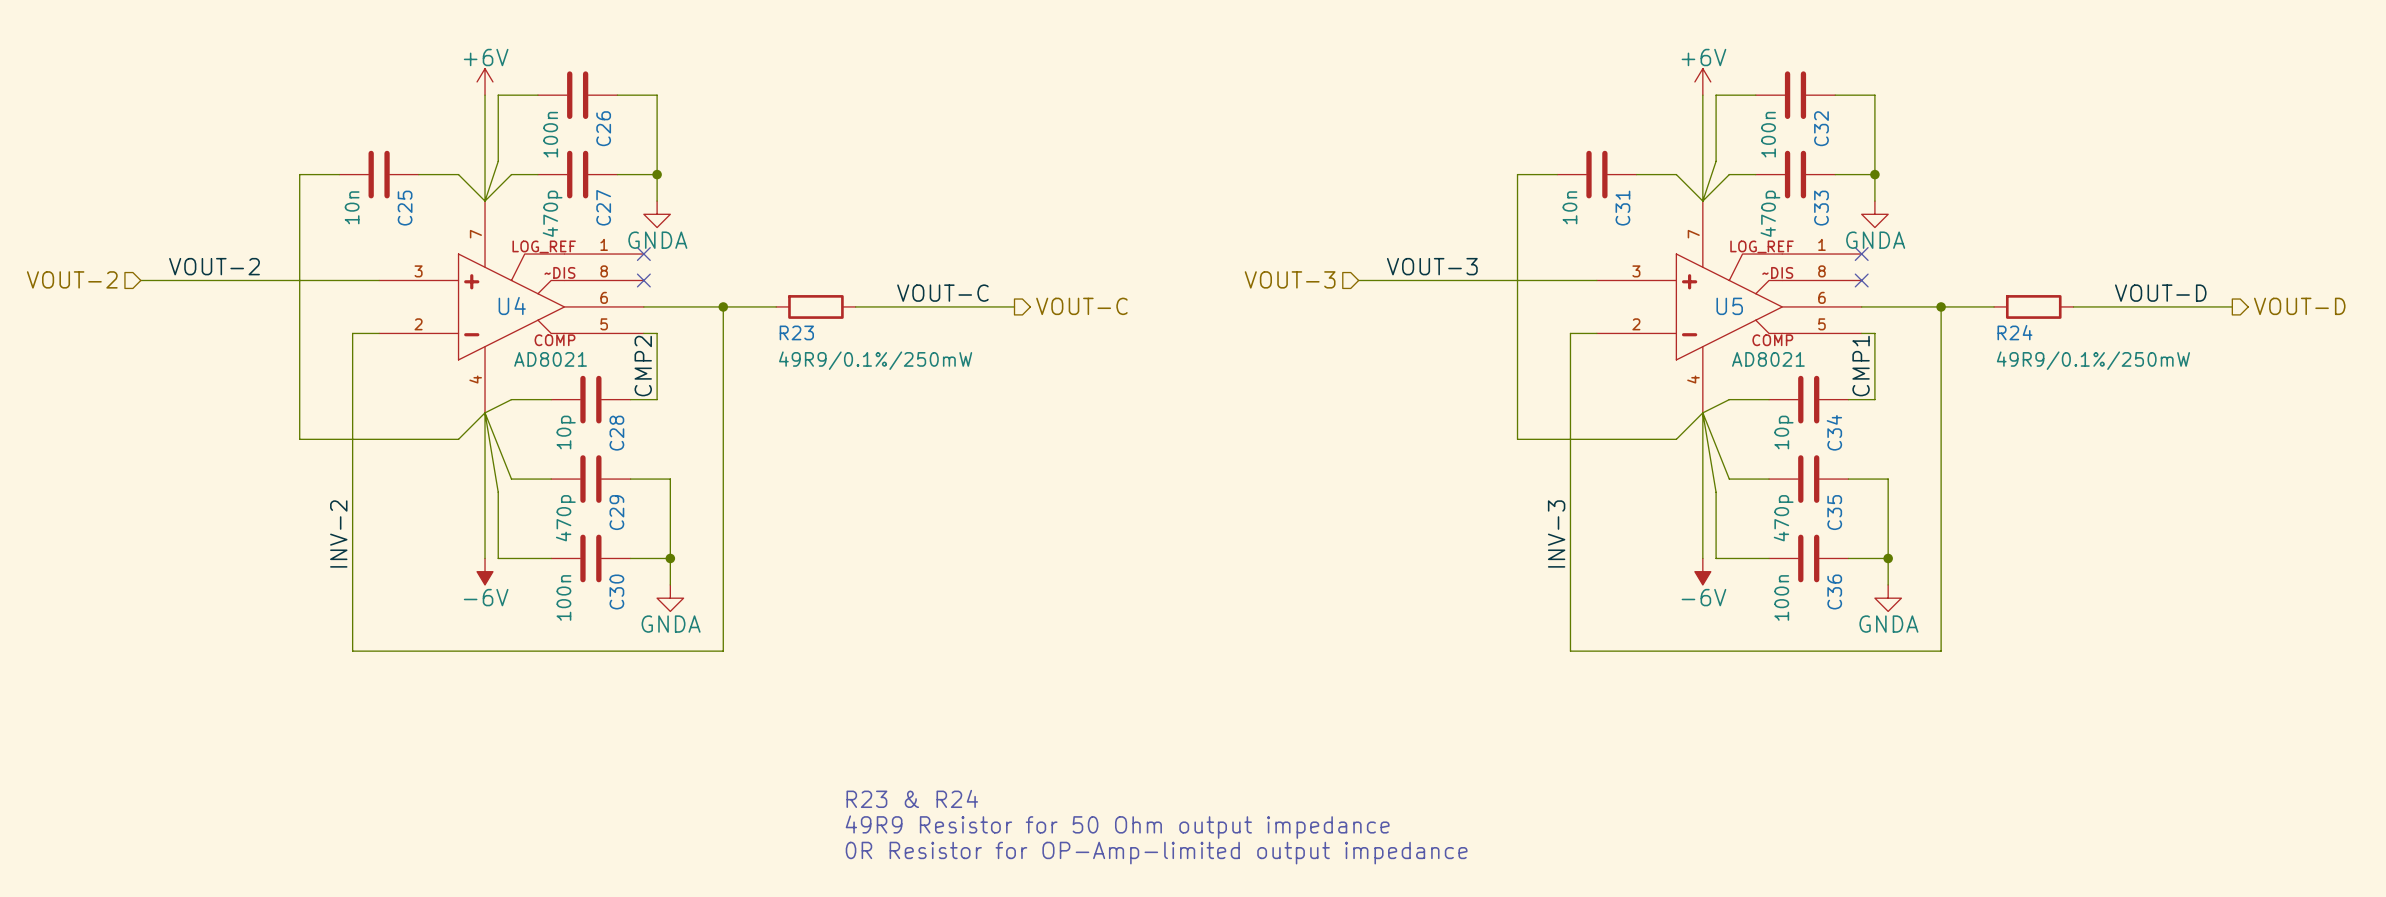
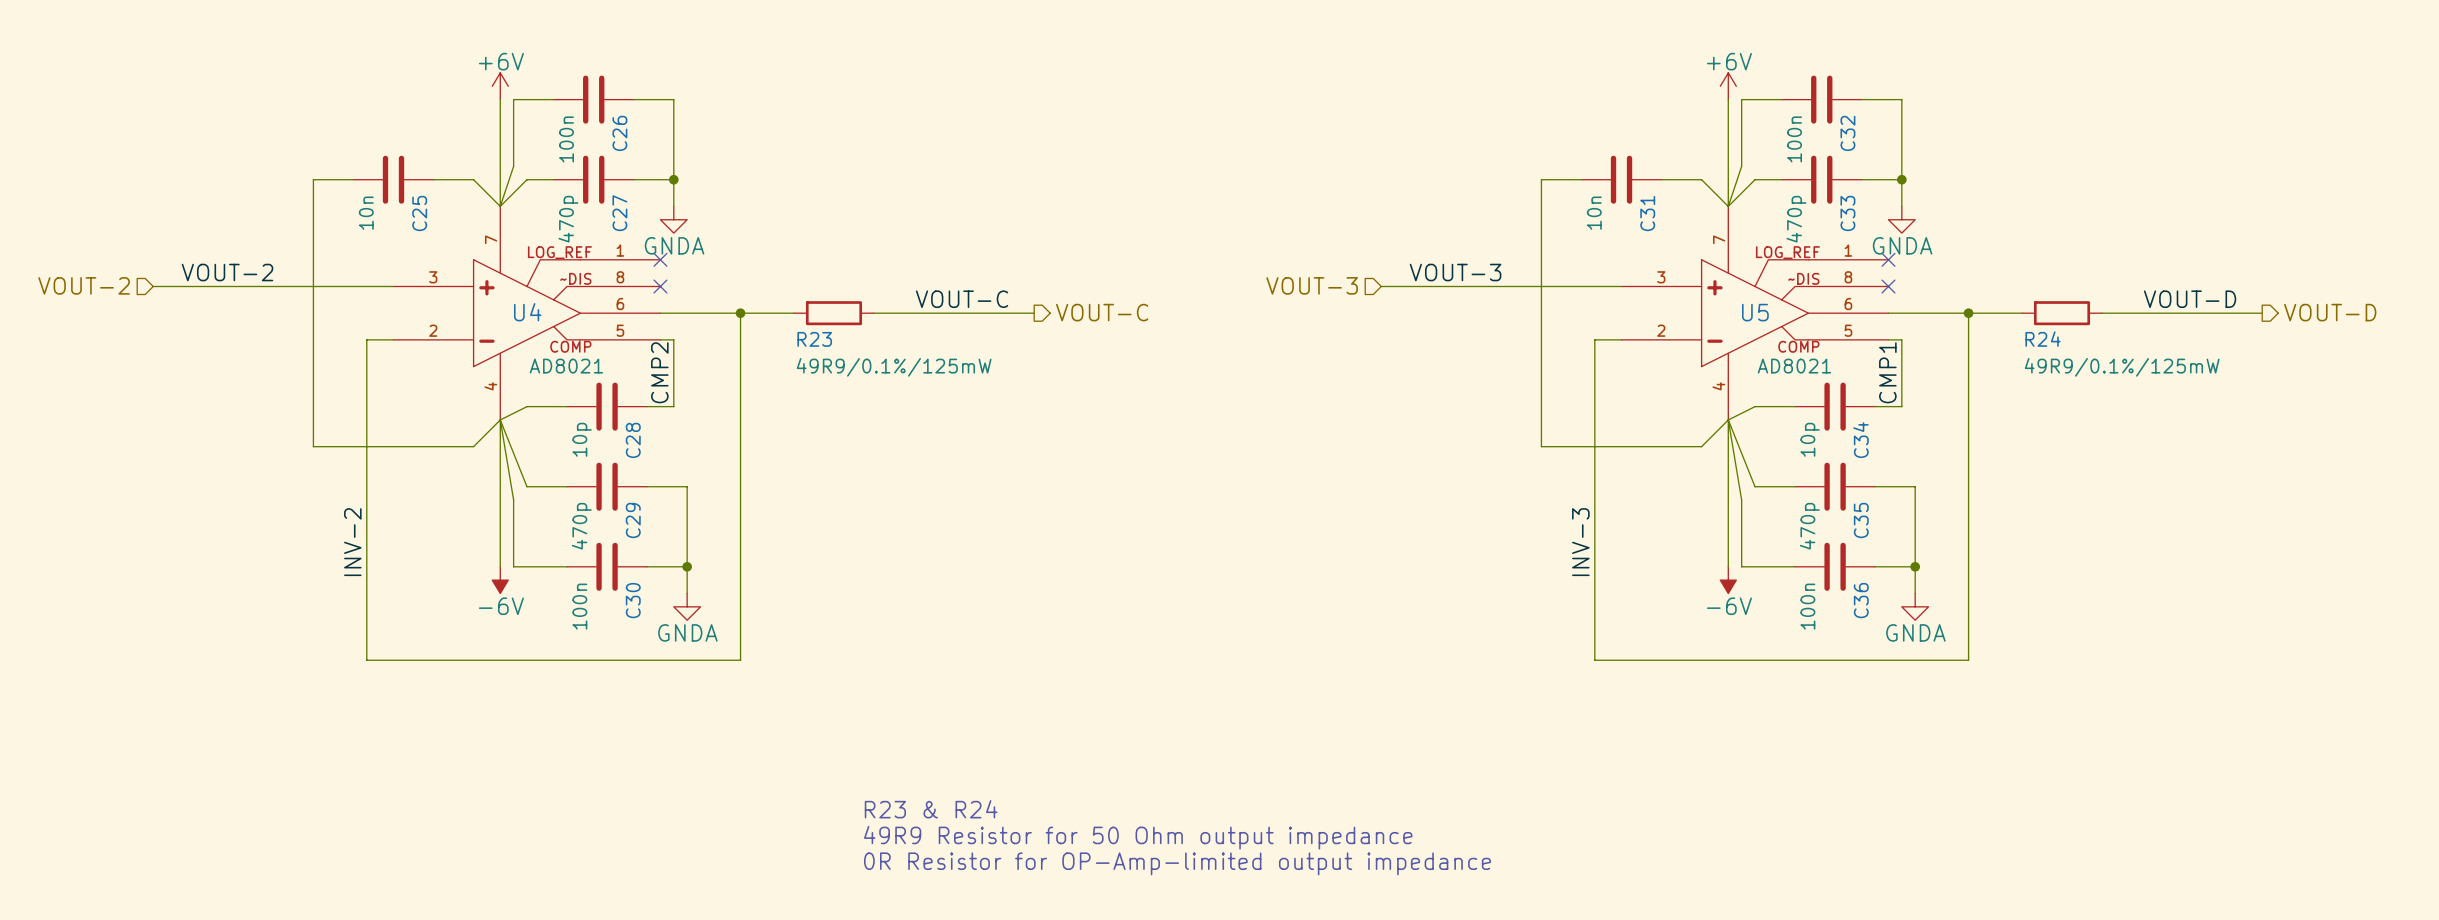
R23 value: 49R9/0.1%/250mW (875, 360) -> 49R9/0.1%/125mW (894, 367)
R24 value: 49R9/0.1%/250mW (2093, 360) -> 49R9/0.1%/125mW (2122, 367)

